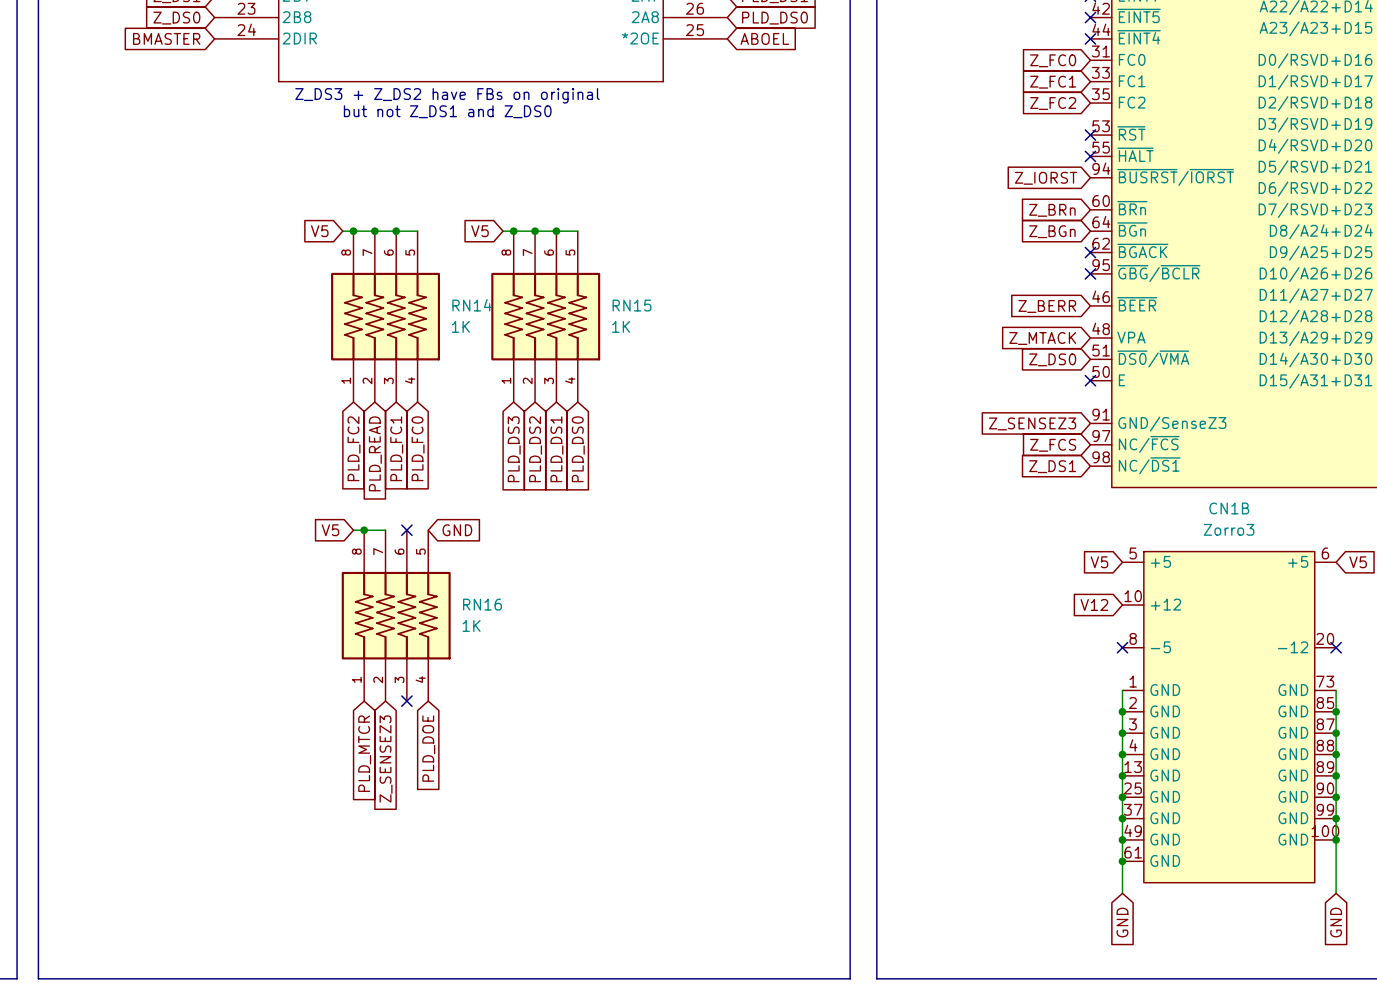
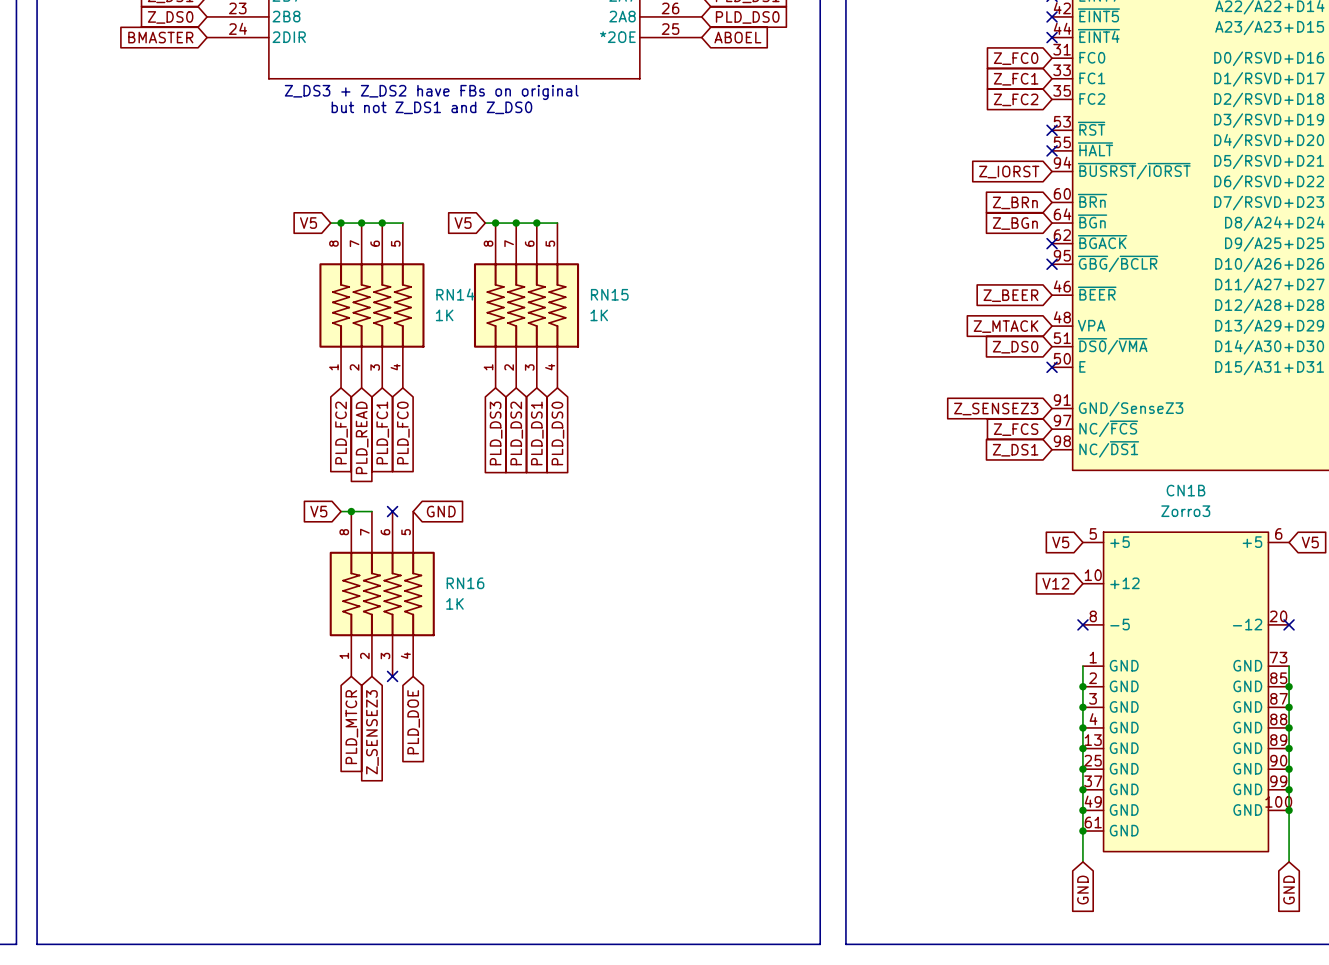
global label: Z_BERR (1047, 306) -> Z_BEER (1010, 295)

